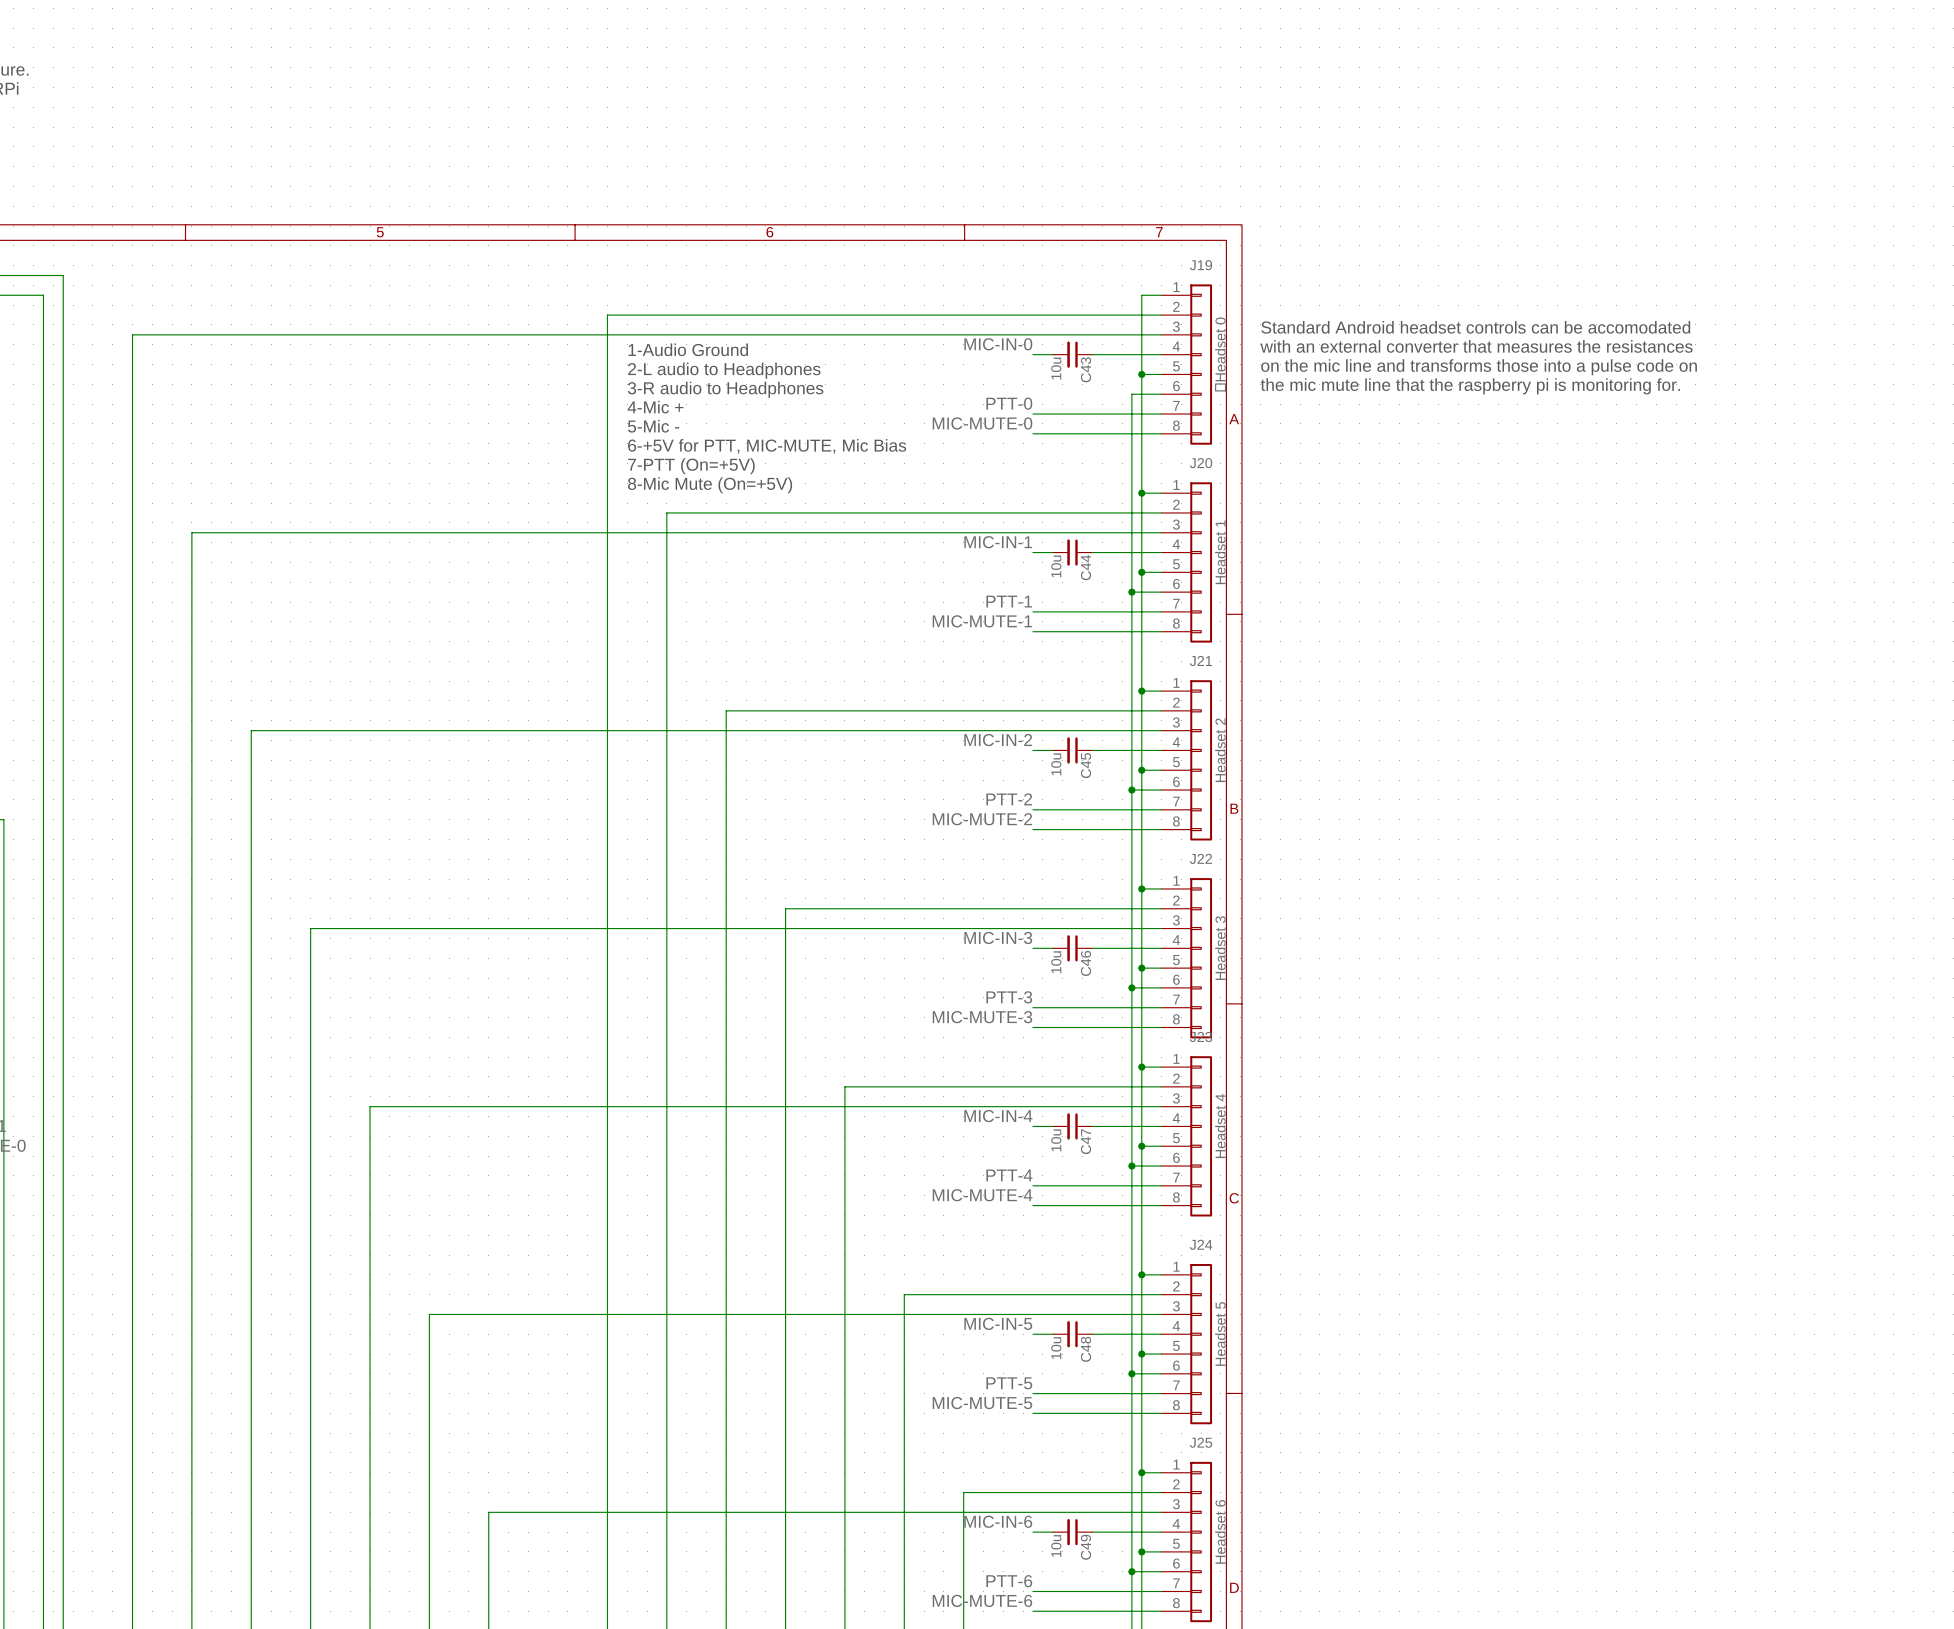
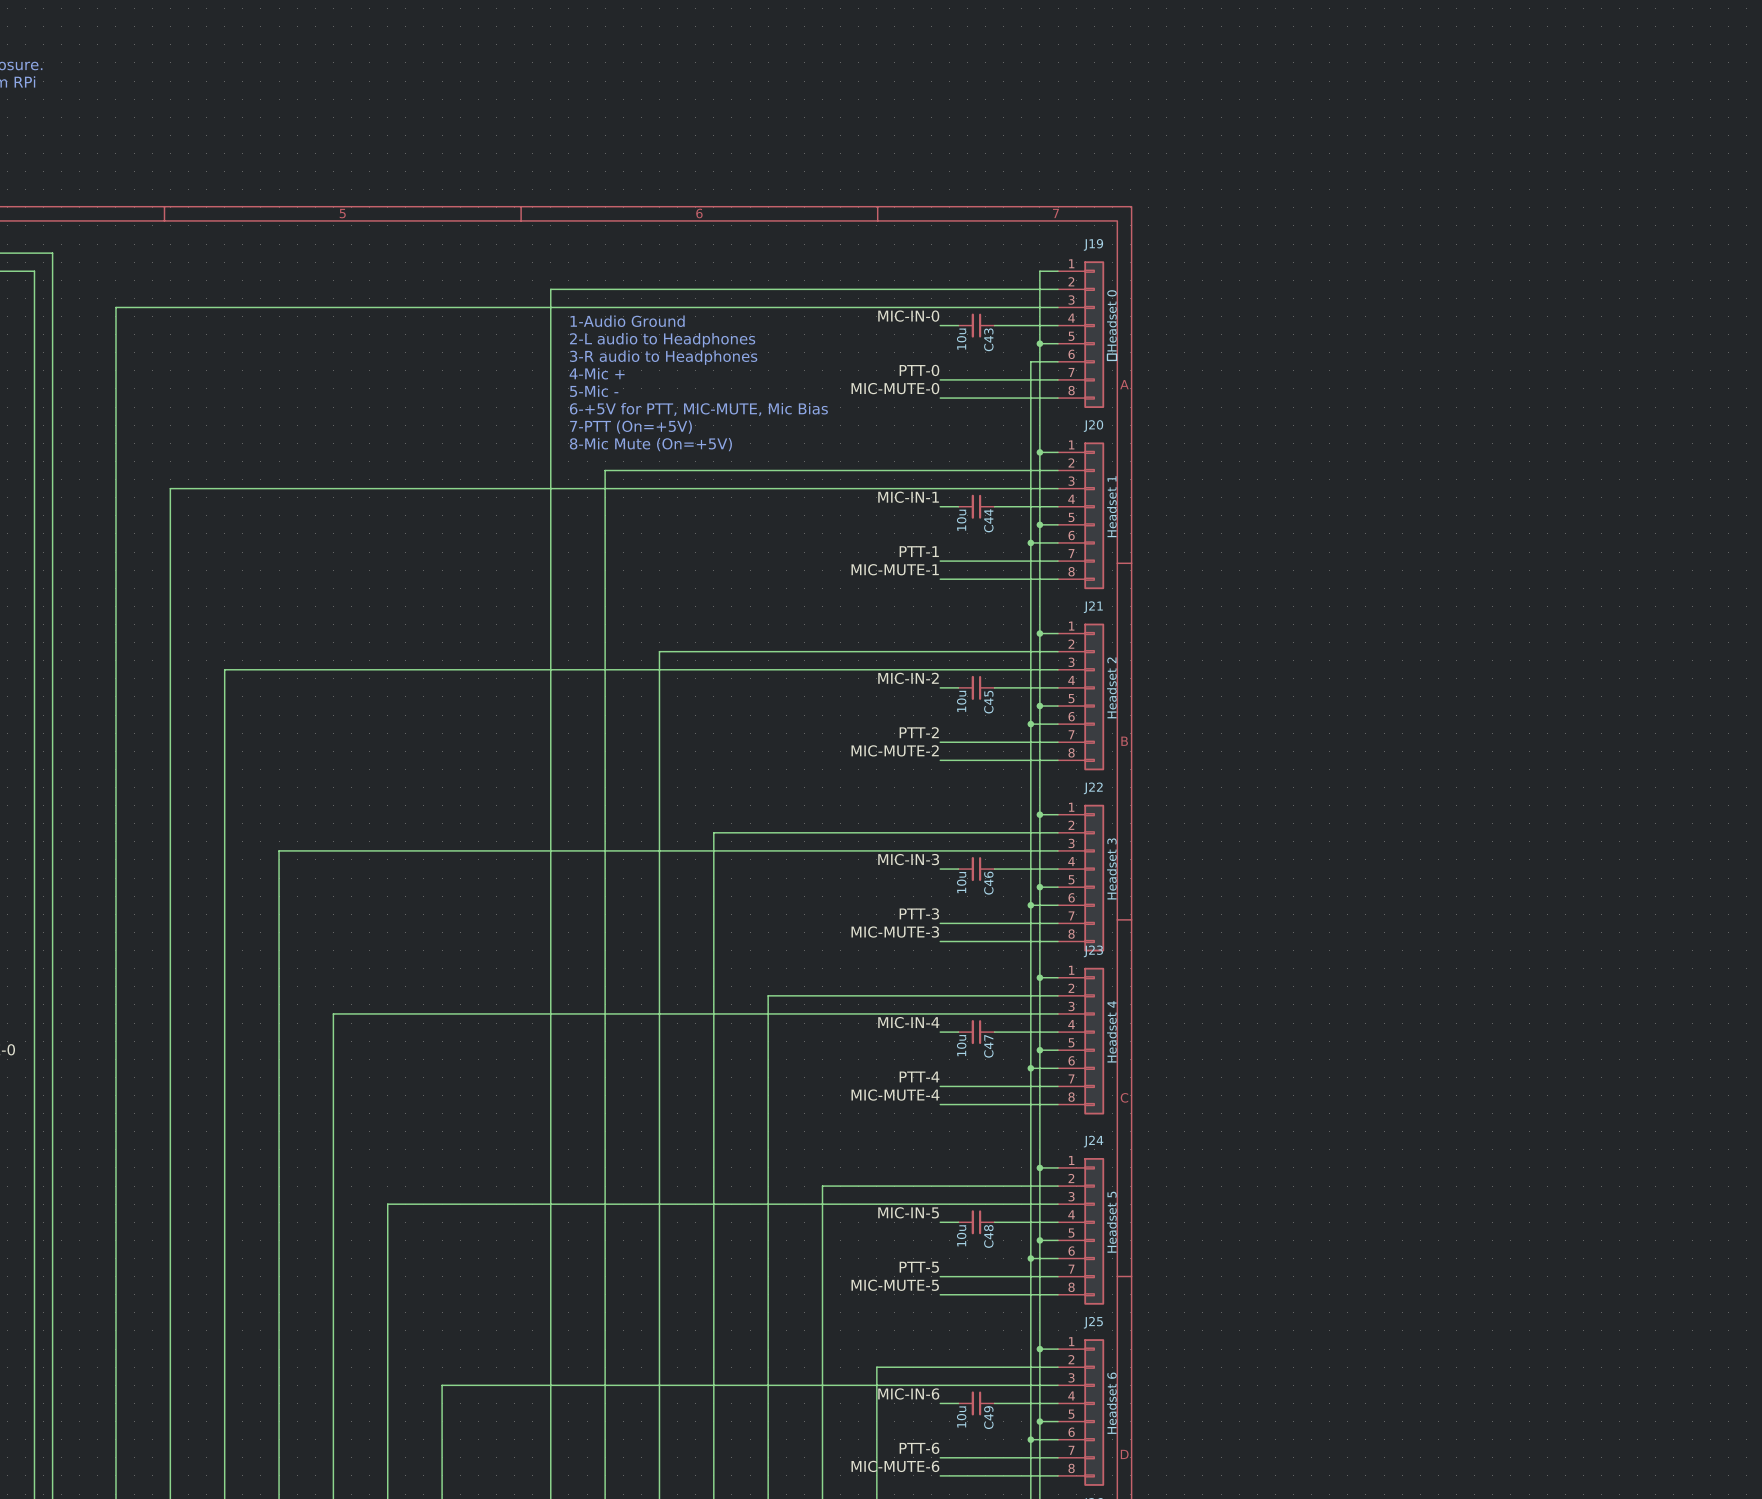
text: Standard Android headset controls can be accomodated (1475, 327) -> none
text: with an external converter that measures the resistances (1476, 346) -> none
text: on the mic line and transforms those into a pulse code on (1479, 367) -> none
text: the mic mute line that the raspberry pi is monitoring for. (1470, 386) -> none

